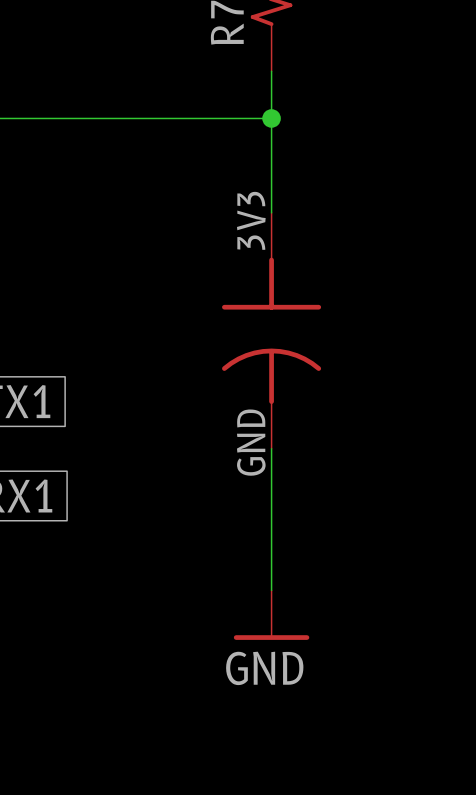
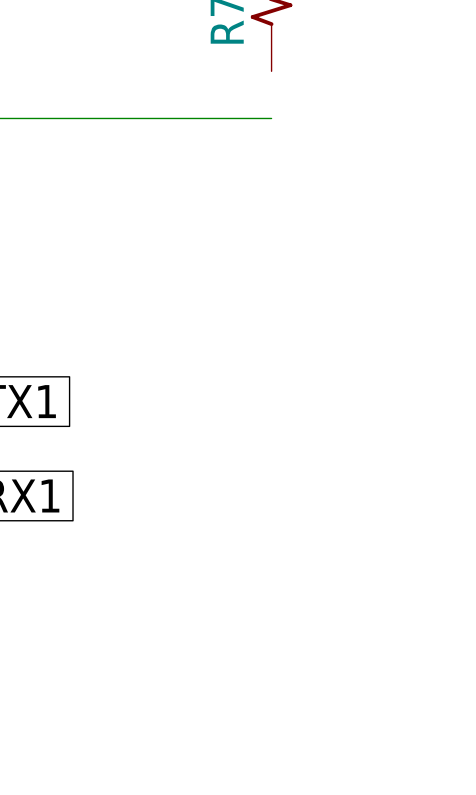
wire: (271, 71) (271, 212) -> none
junction: (271, 118) -> none
part: (271, 330) -> none
wire: (271, 448) (271, 590) -> none
power symbol: GND (271, 615) -> none

